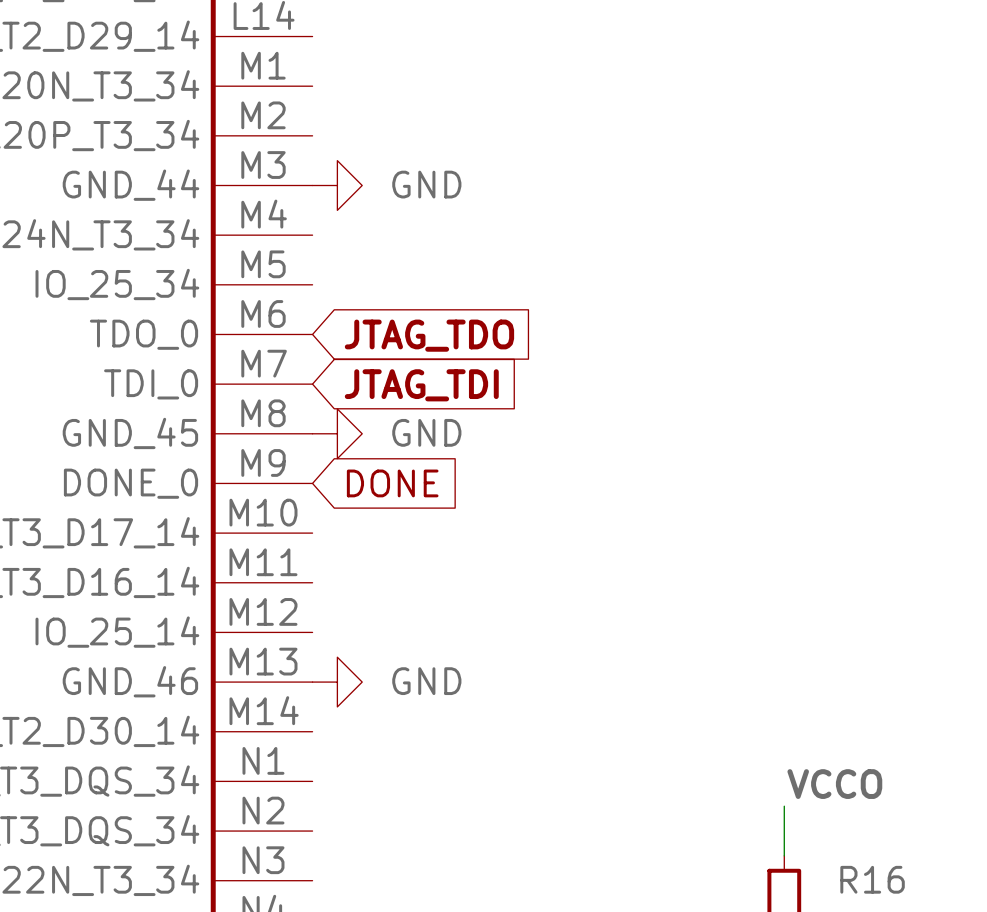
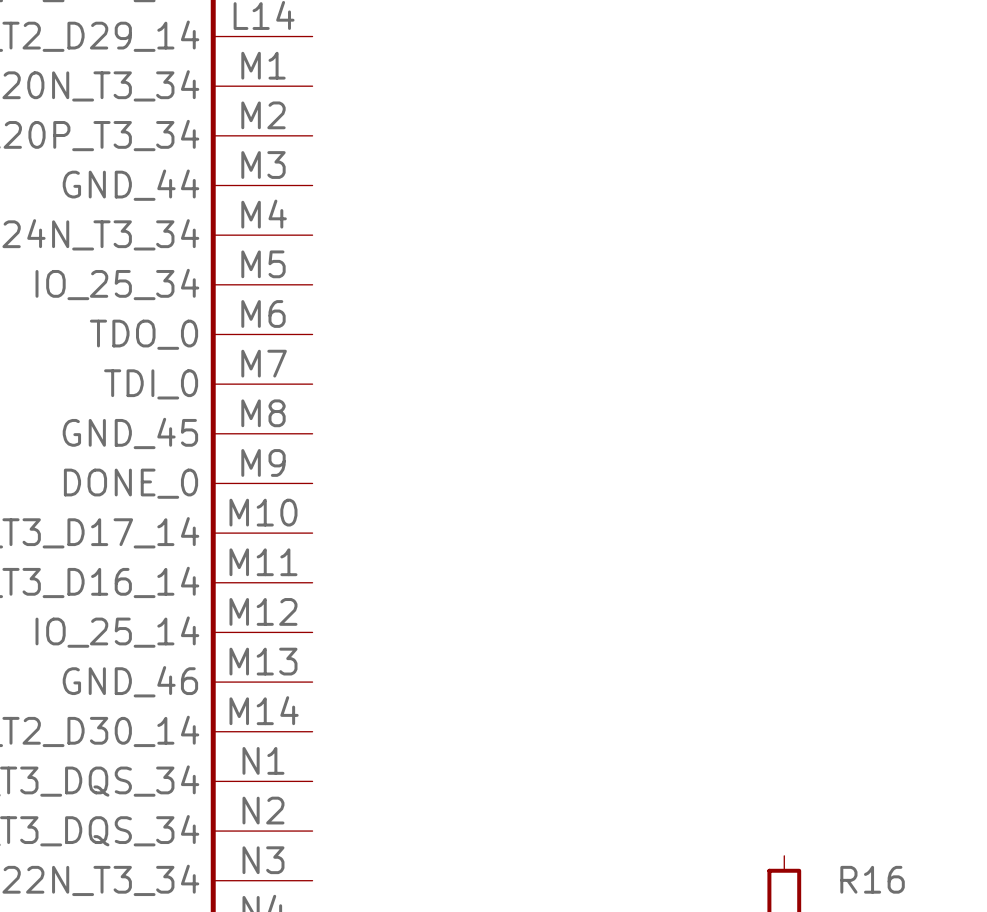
power symbol: GND (337, 185) -> none
global label: JTAG_TDO (429, 335) -> none
global label: JTAG_TDI (421, 385) -> none
power symbol: GND (337, 433) -> none
global label: DONE (392, 483) -> none
power symbol: GND (337, 682) -> none
label: VCCO (834, 784) -> none
wire: (784, 806) (784, 855) -> none

